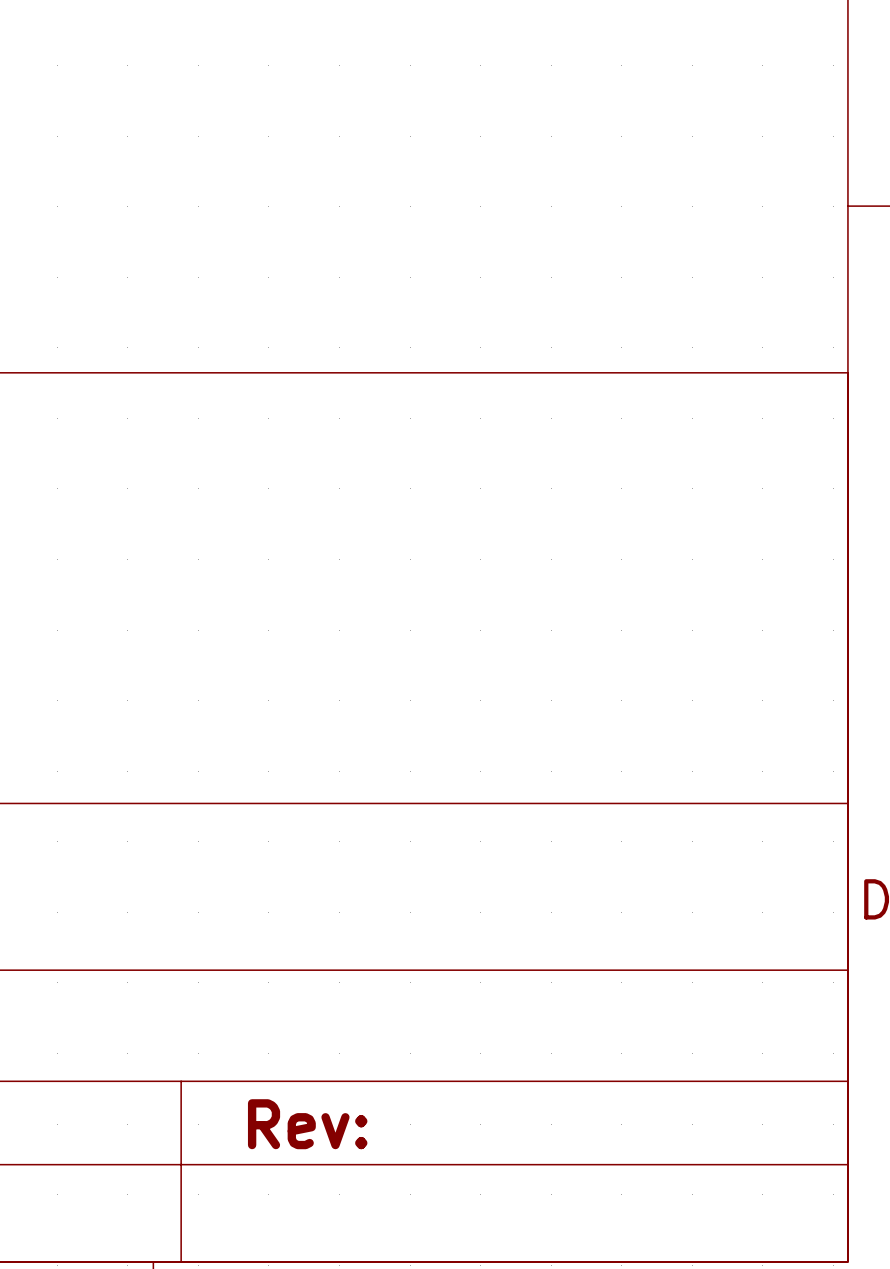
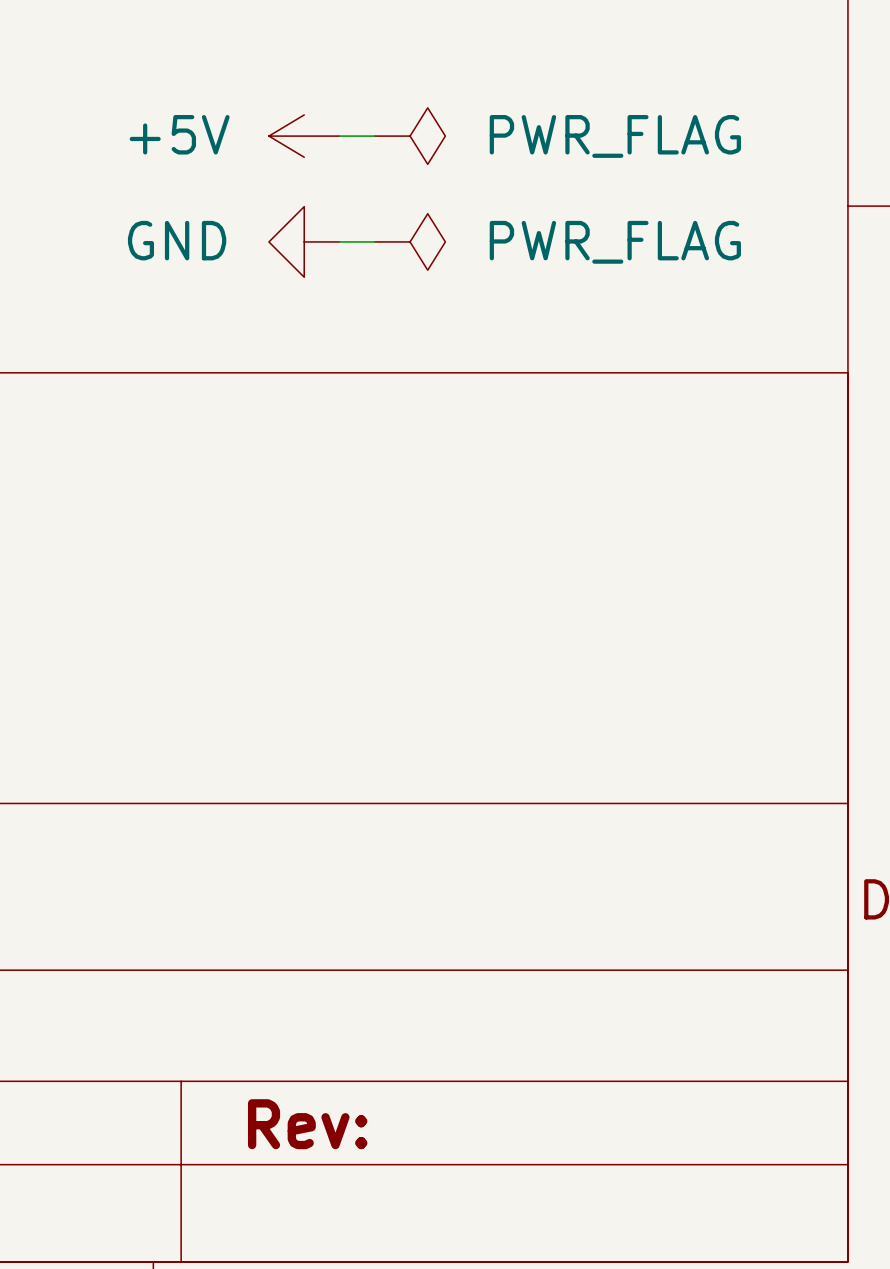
power symbol: none -> +5V (304, 136)
wire: none -> (339, 136) (374, 136)
power symbol: none -> PWR_FLAG (410, 136)
power symbol: none -> GND (304, 241)
wire: none -> (339, 241) (374, 241)
power symbol: none -> PWR_FLAG (410, 241)

